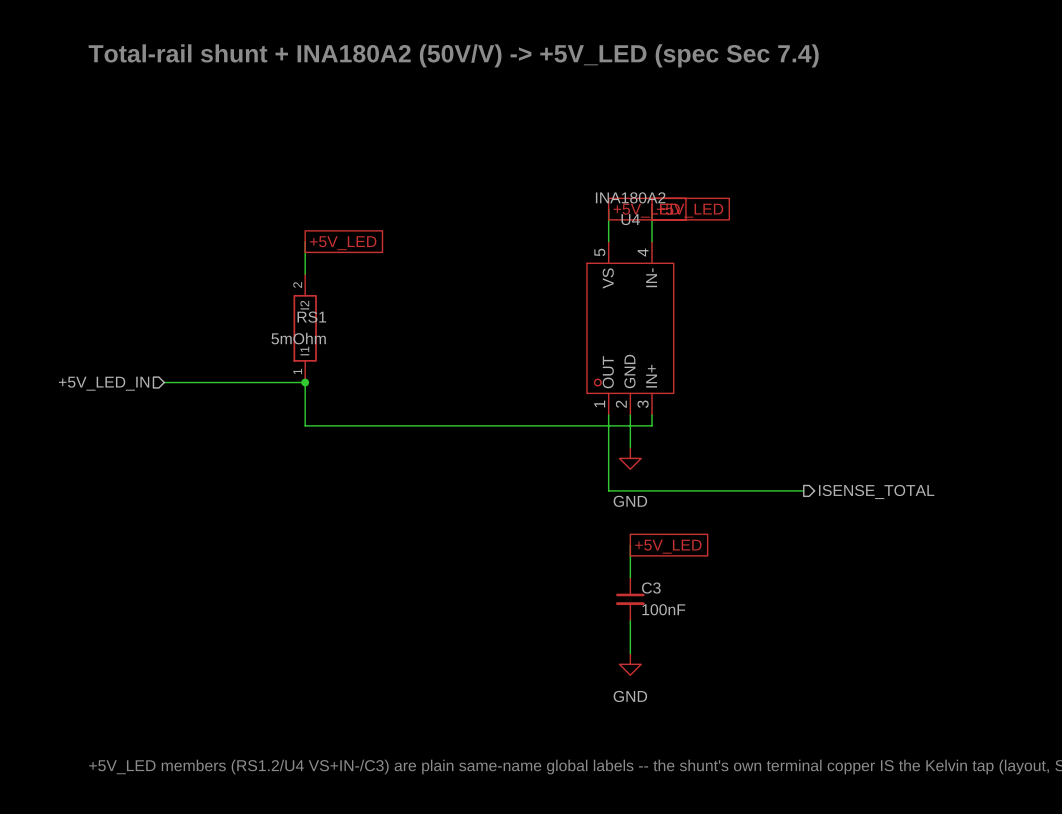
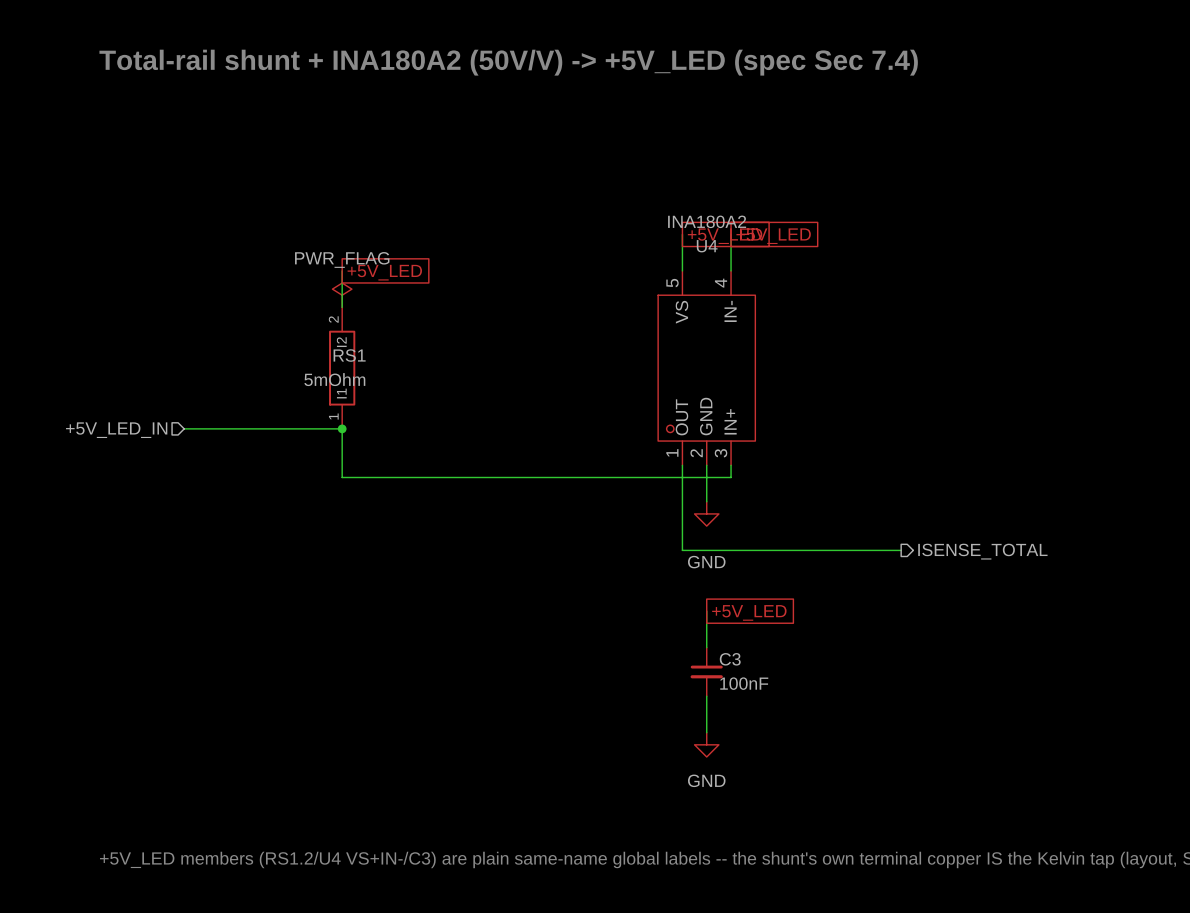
power symbol: none -> PWR_FLAG (342, 295)

